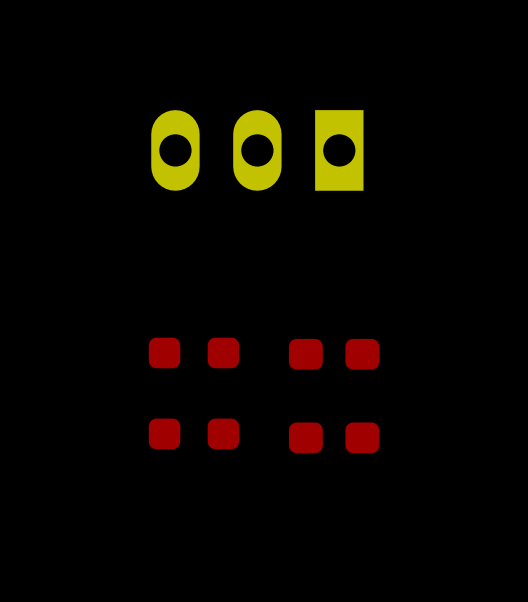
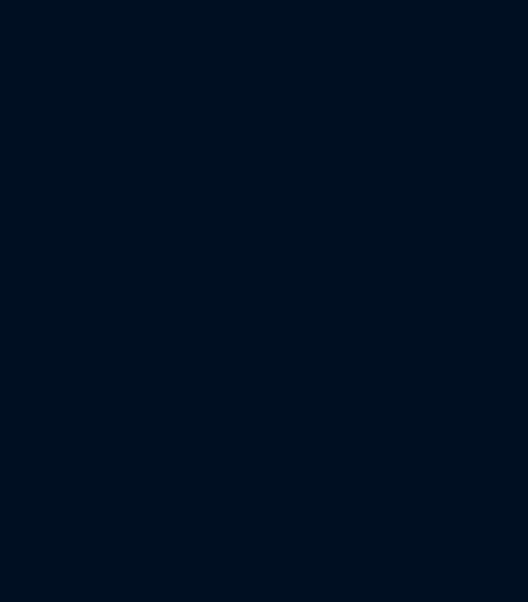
part: (257, 150) -> none
part: (193, 352) -> none
part: (334, 354) -> none
part: (193, 433) -> none
part: (334, 437) -> none

